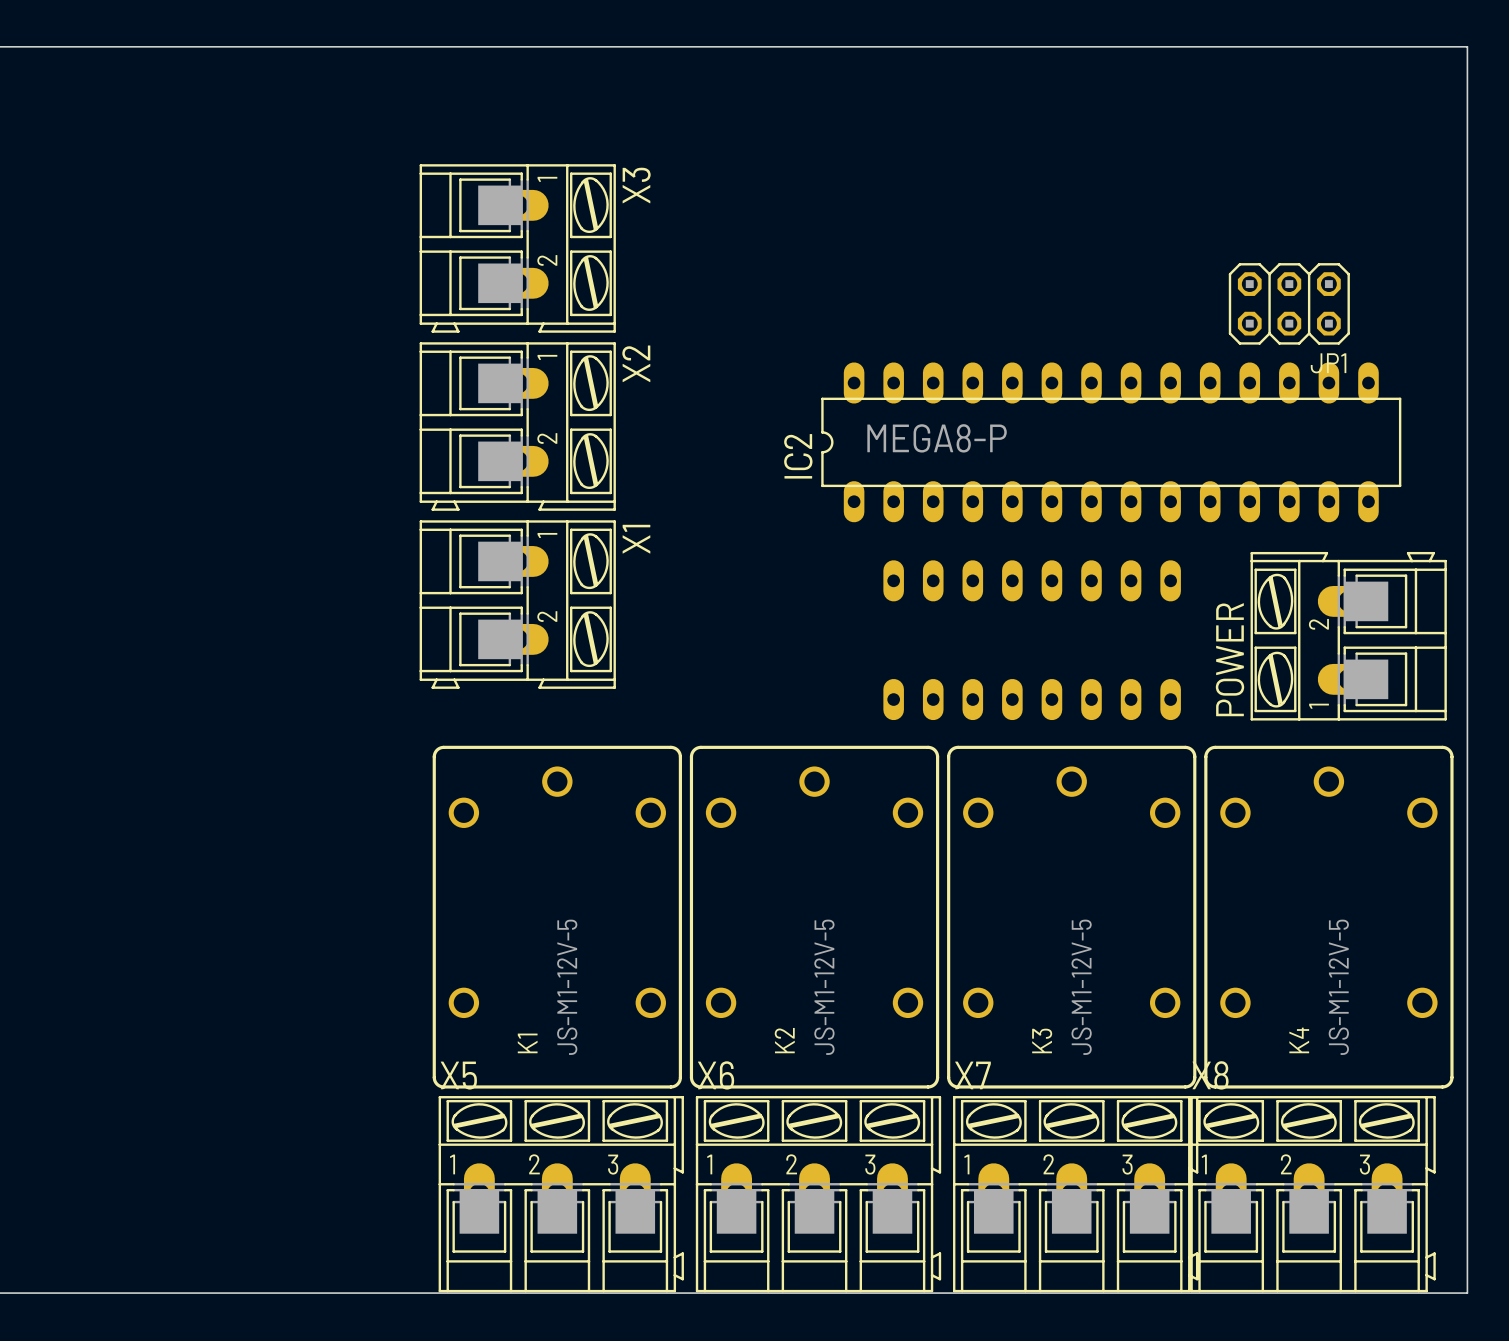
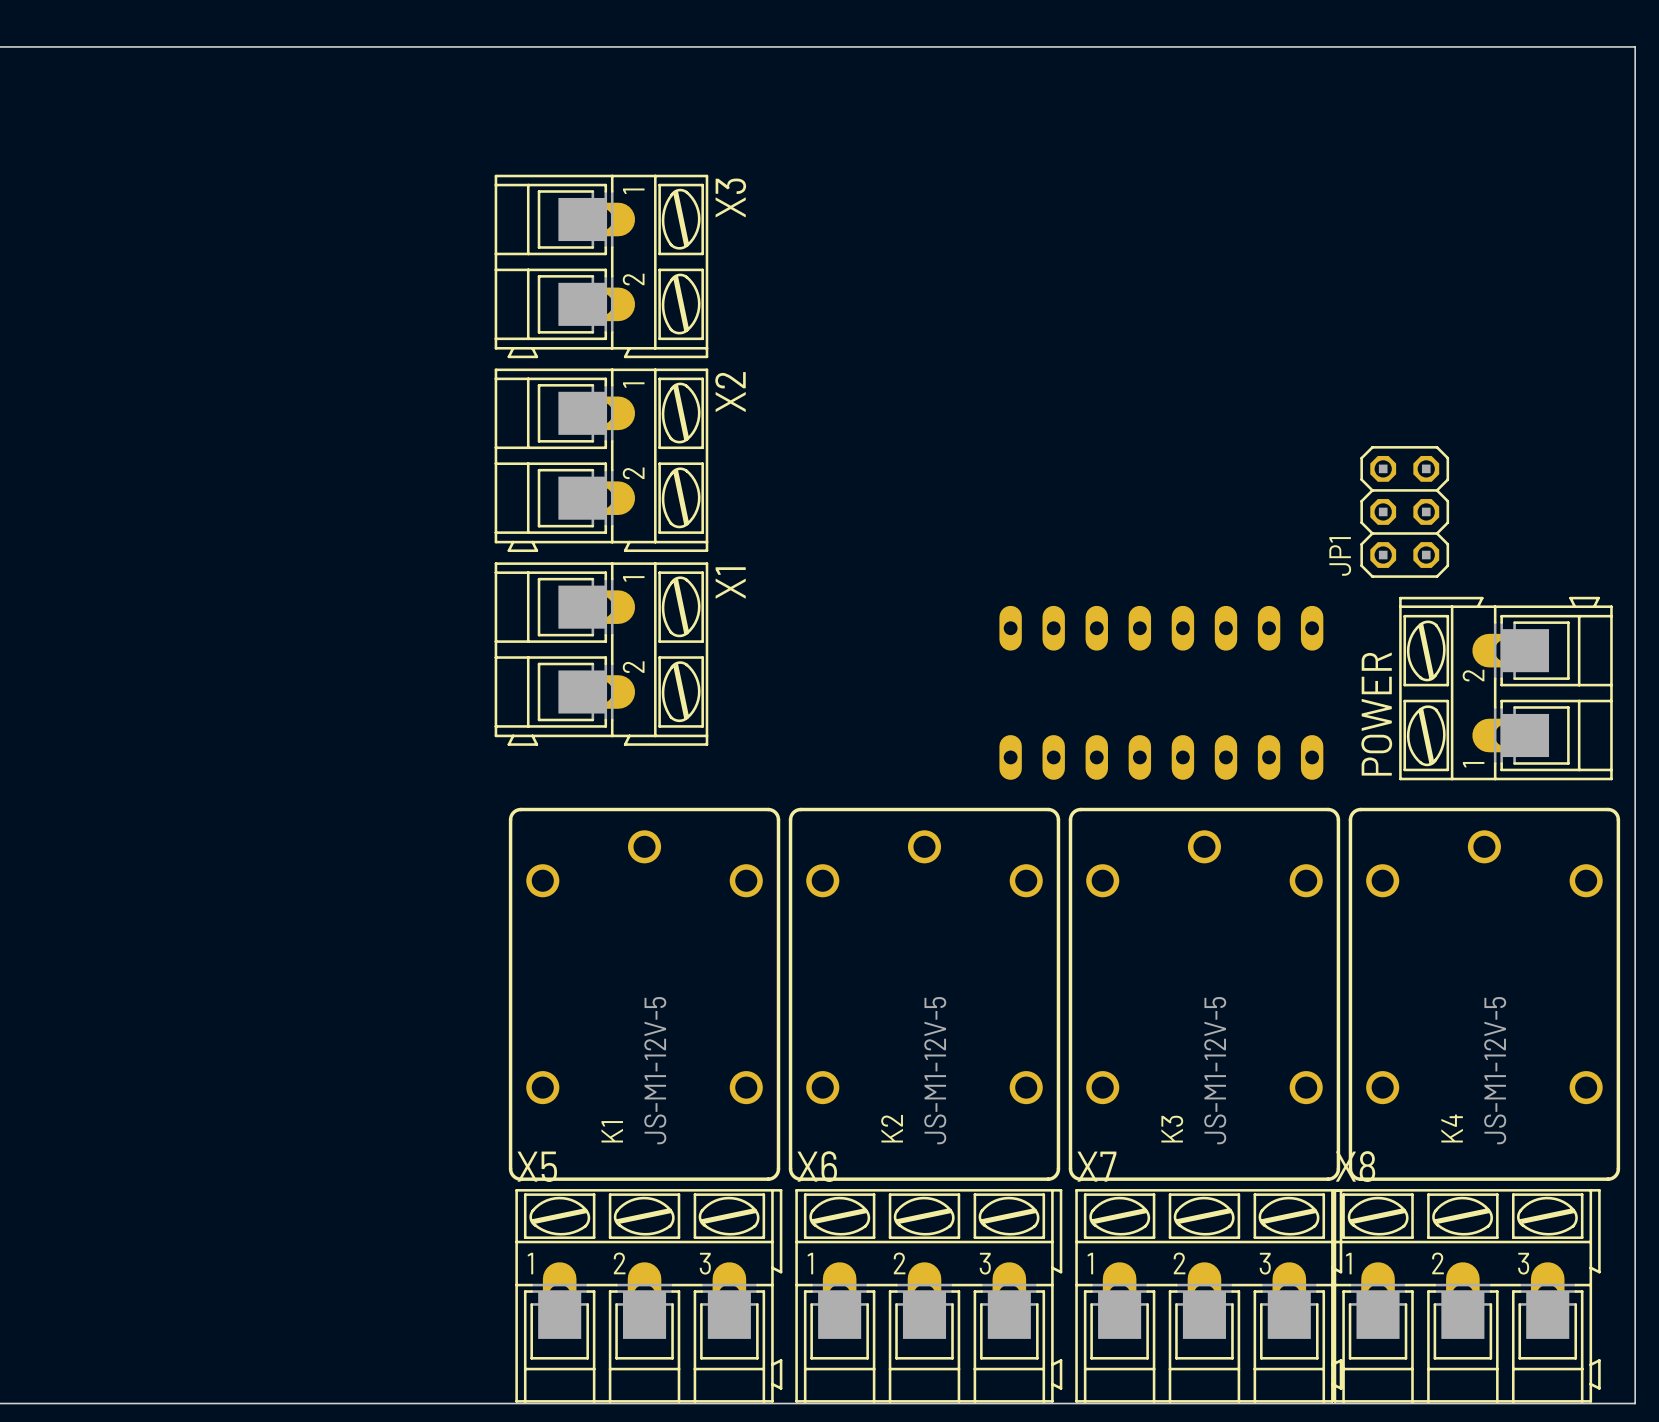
JP1 rotation: 0° (1289, 303) -> 90° clockwise (1404, 511)
JP1 position: (1289, 303) -> (1404, 511)
IC2: MEGA8-P (1111, 442) -> none

